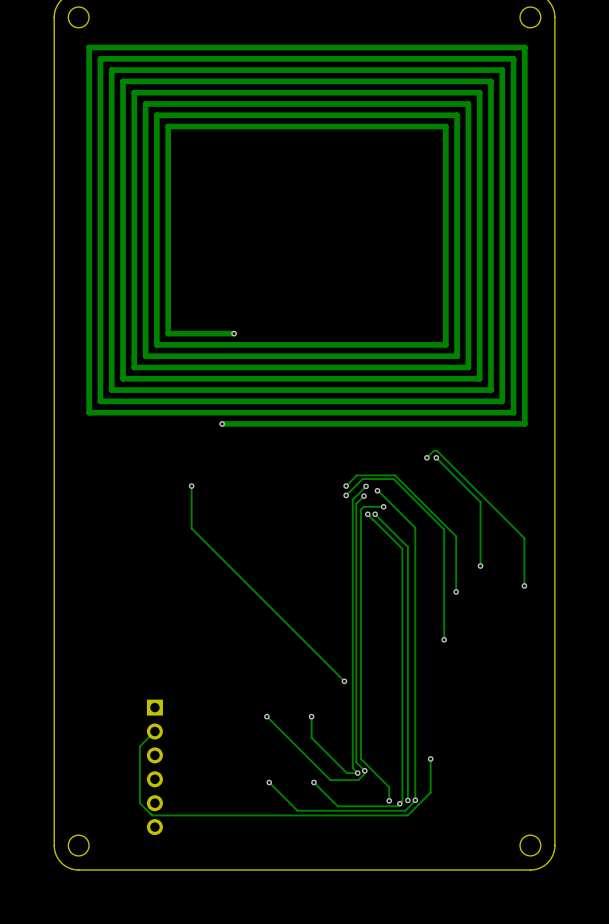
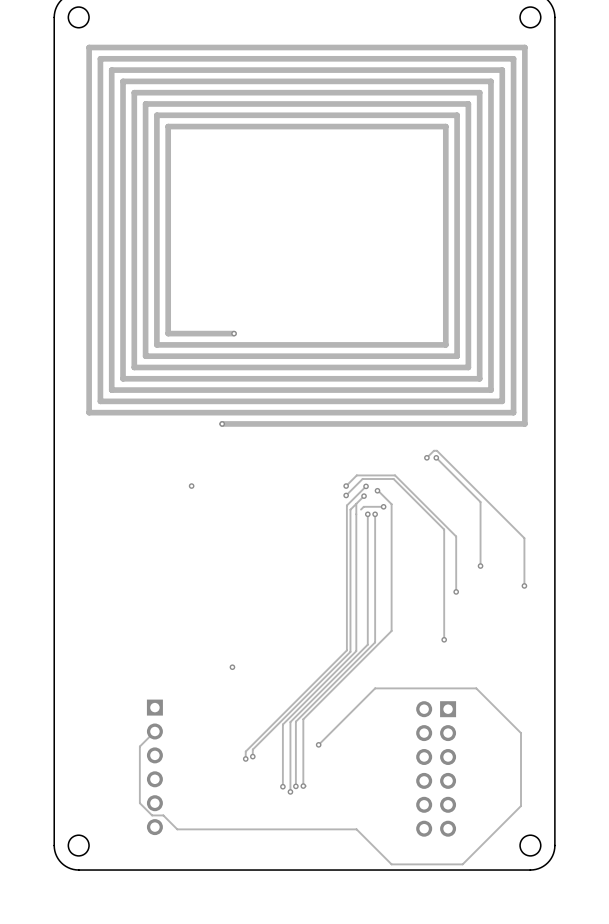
track: (191, 486) (191, 528) (344, 681) -> none
track: (352, 499) (352, 768) (357, 773) (346, 773) (311, 737) (311, 716) -> (352, 499) (346, 505) (346, 650) (245, 751) (245, 758)
track: none -> (356, 503) (350, 509) (350, 651) (252, 749) (252, 756)
track: (391, 504) (415, 527) (415, 800) (405, 810) (297, 810) (269, 782) -> (391, 504) (391, 631) (303, 719) (303, 786) (305, 786)
track: (361, 509) (361, 758) (389, 787) (389, 800) -> none
track: (367, 514) (402, 548) (402, 801) (397, 806) (337, 806) (313, 782) -> (367, 514) (367, 644) (290, 722) (290, 791)
track: (375, 514) (407, 547) (407, 800) -> (375, 514) (375, 642) (295, 721) (295, 786)
track: (356, 651) (356, 762) (364, 770) (364, 773) (358, 780) (330, 780) (266, 716) -> (356, 651) (282, 724) (282, 786)
via: none -> (232, 667)
via: (344, 681) -> none
via: (266, 716) -> none
via: (311, 716) -> none
via: none -> (318, 744)
via: none -> (252, 756)
via: none -> (245, 758)
track: (430, 758) (430, 792) (407, 815) (163, 815) -> (318, 744) (375, 688) (476, 688) (521, 733) (521, 806) (462, 864) (391, 864) (356, 829) (177, 829) (163, 815)
via: (430, 758) -> none
part: none -> (436, 768)
via: (364, 770) -> none
via: (357, 773) -> none
via: (269, 782) -> none
via: (313, 782) -> none
via: none -> (282, 786)
via: none -> (295, 786)
via: none -> (303, 786)
via: none -> (290, 791)
via: (389, 800) -> none
via: (407, 800) -> none
via: (415, 800) -> none
via: (399, 803) -> none

